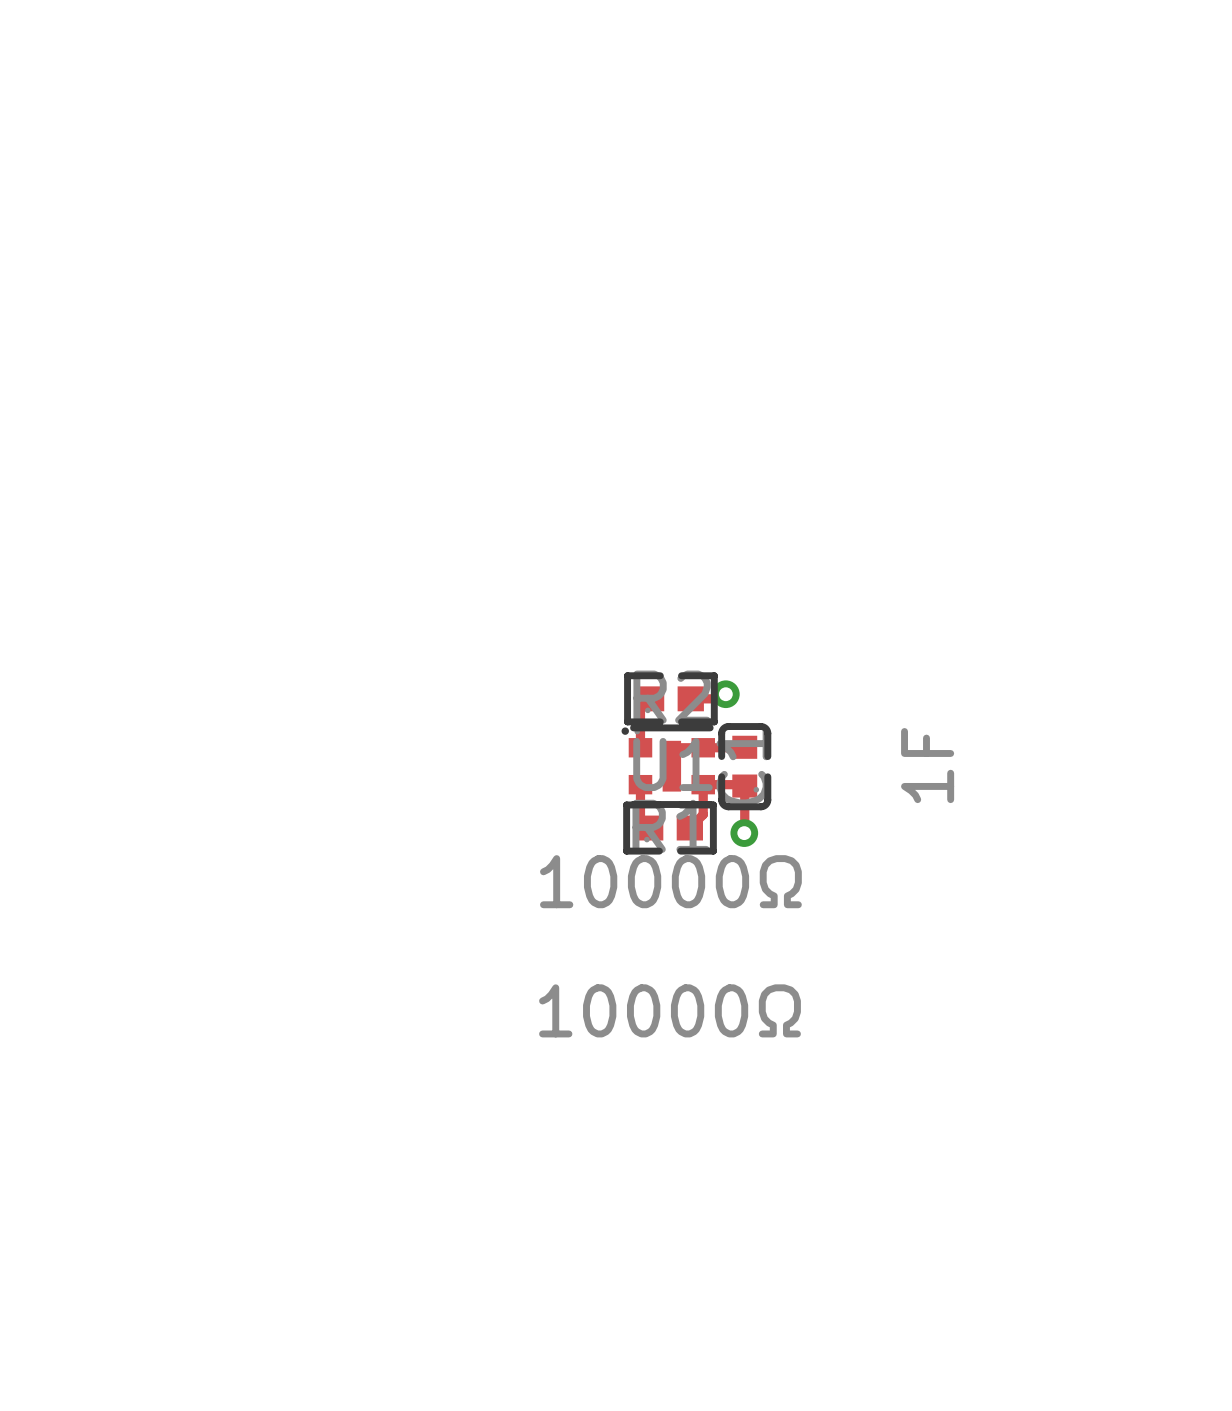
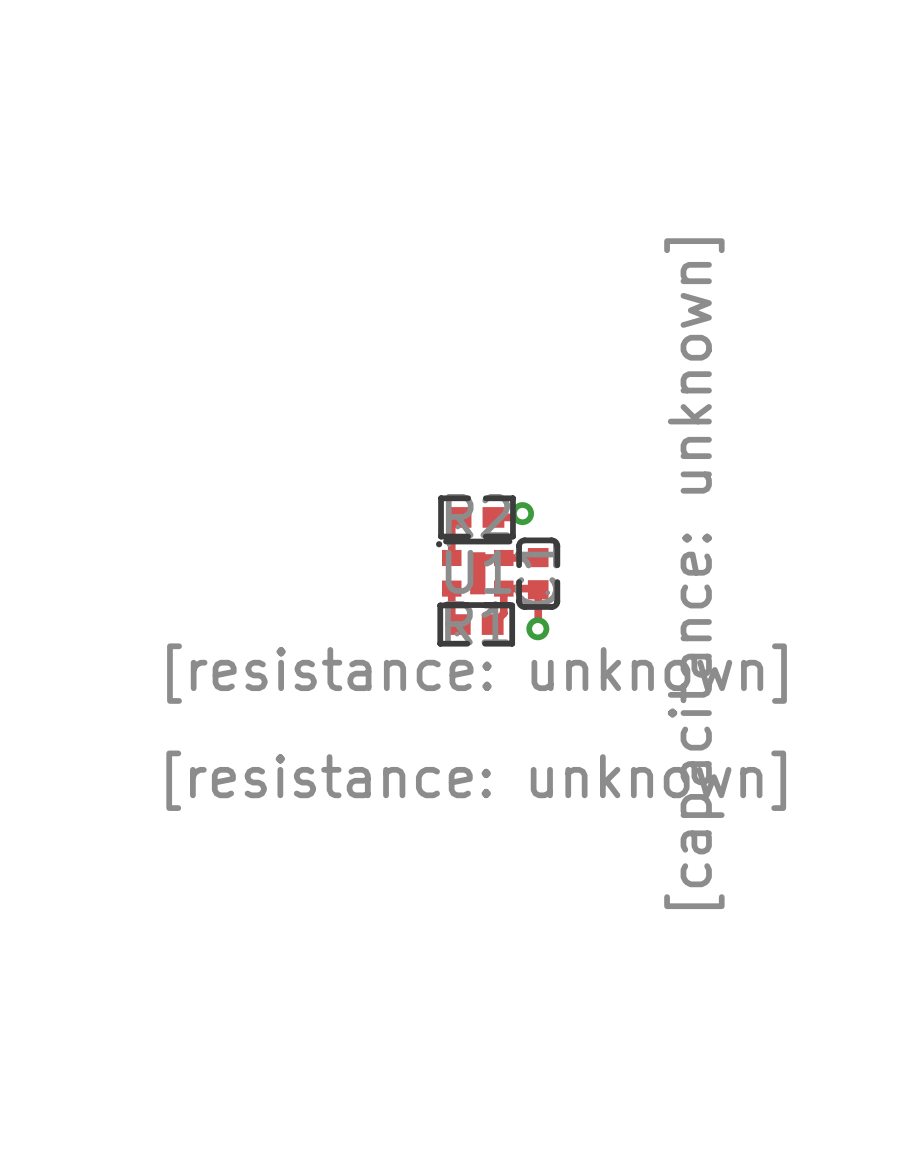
part value: 1F (927, 765) -> [capacitance: unknown] (694, 573)
part value: 10000Ω (670, 881) -> [resistance: unknown] (476, 673)
part value: 10000Ω (670, 1010) -> [resistance: unknown] (476, 780)

